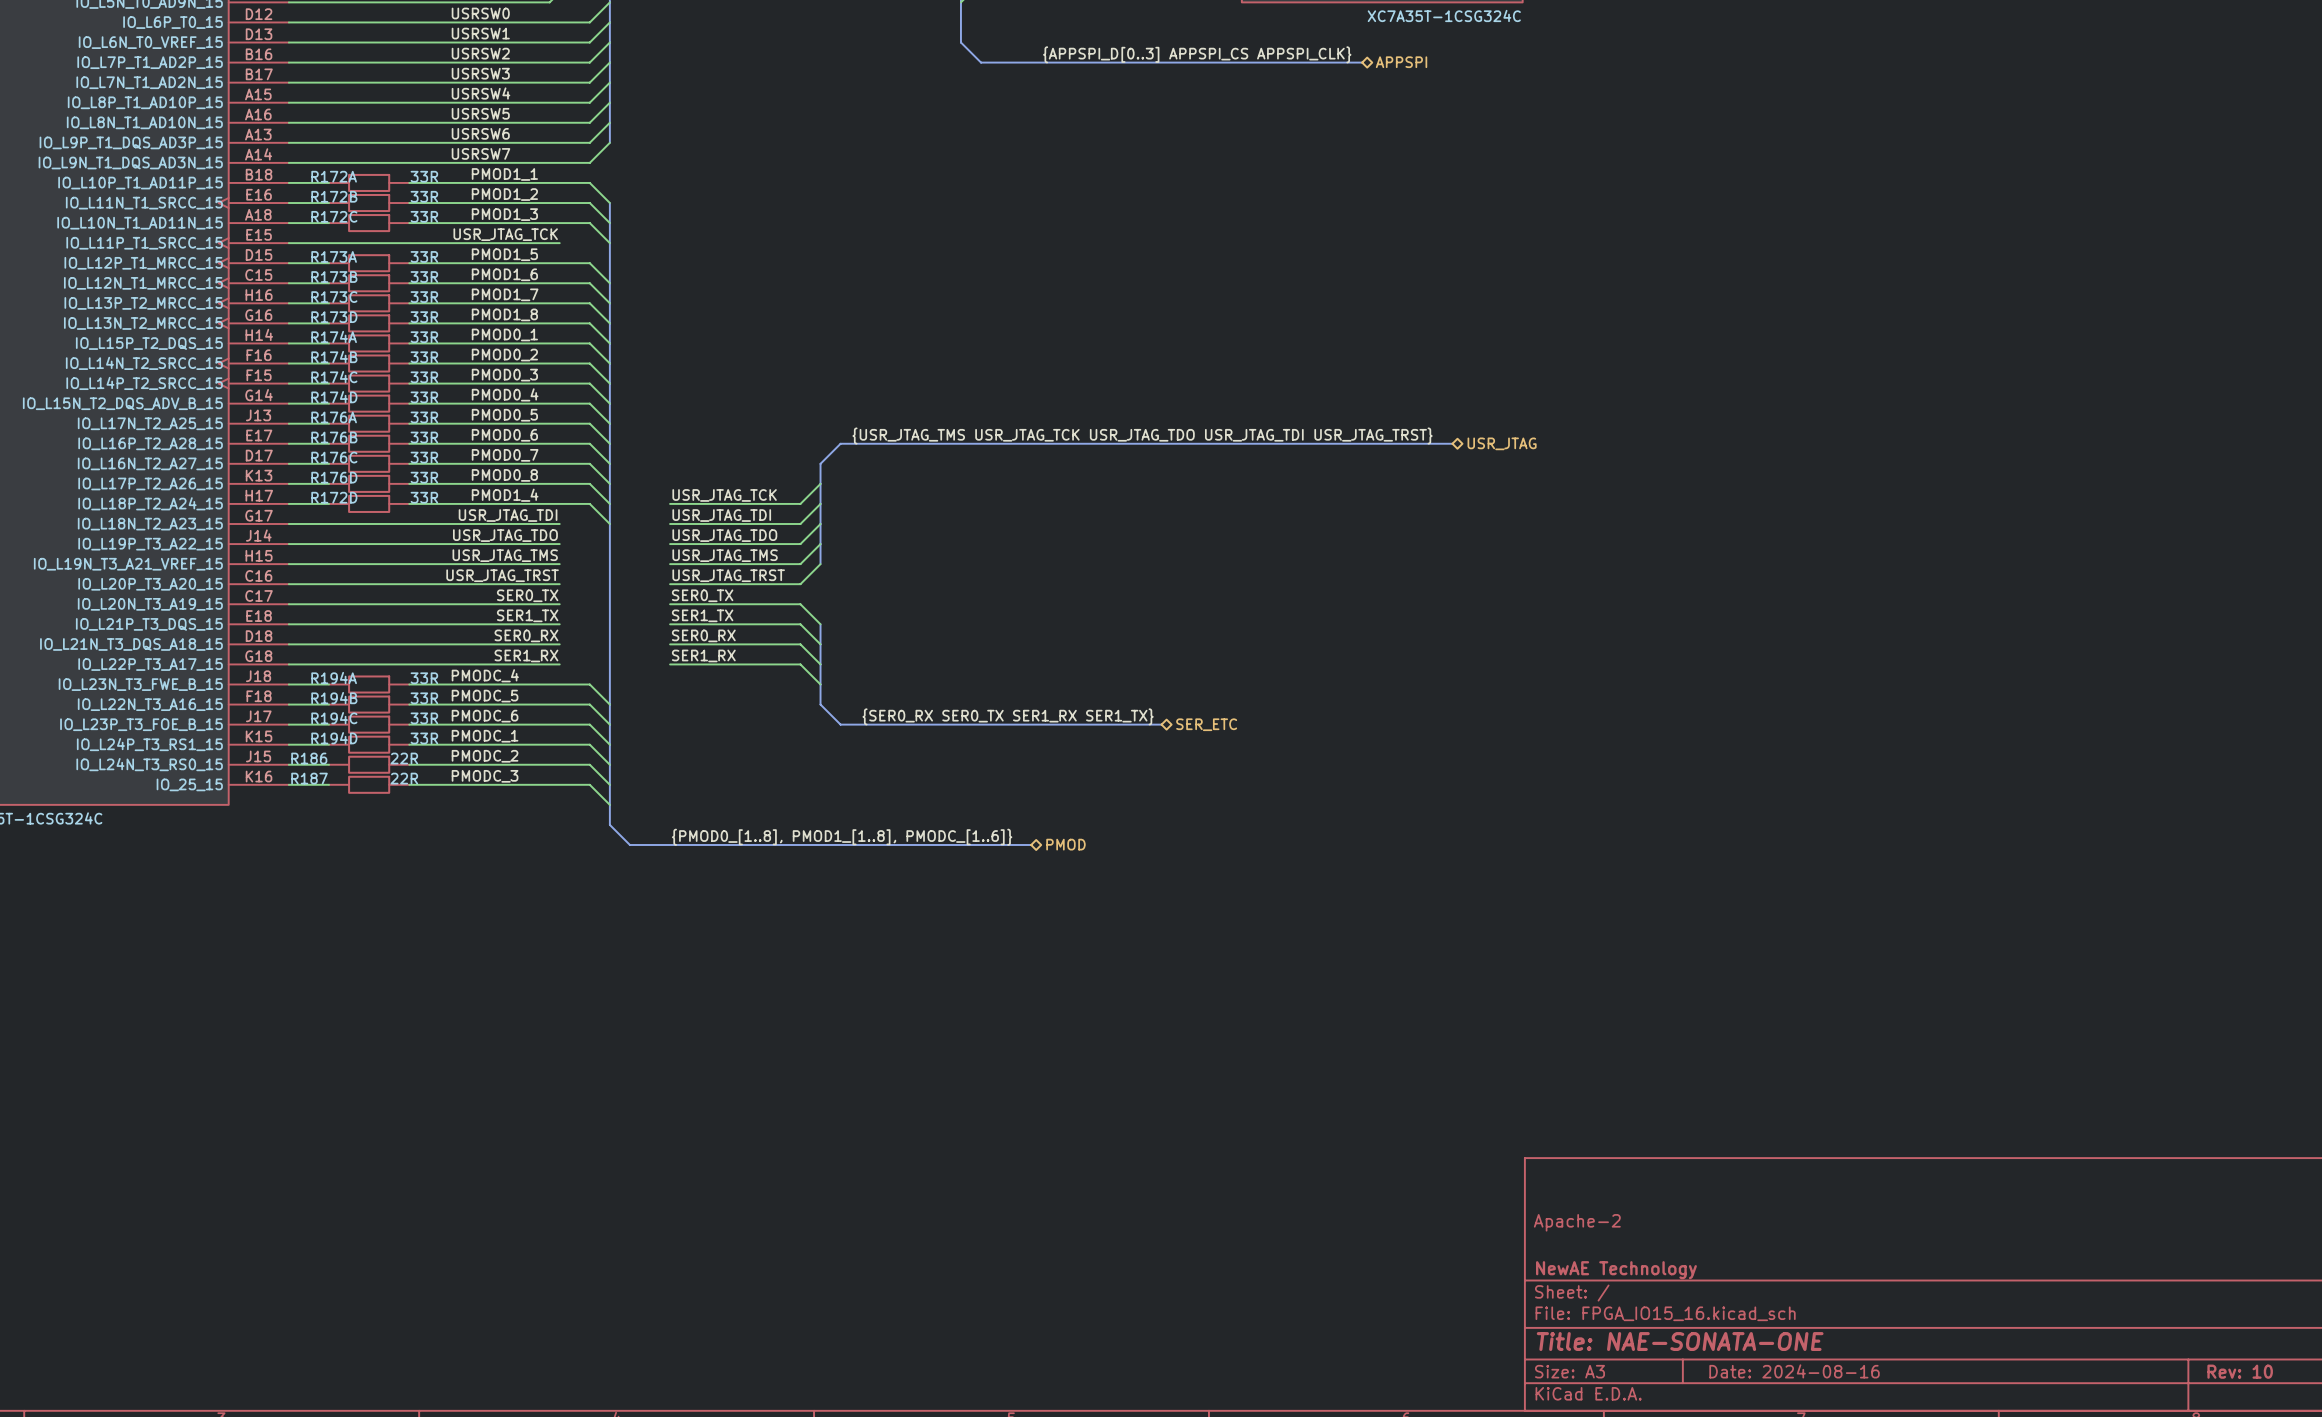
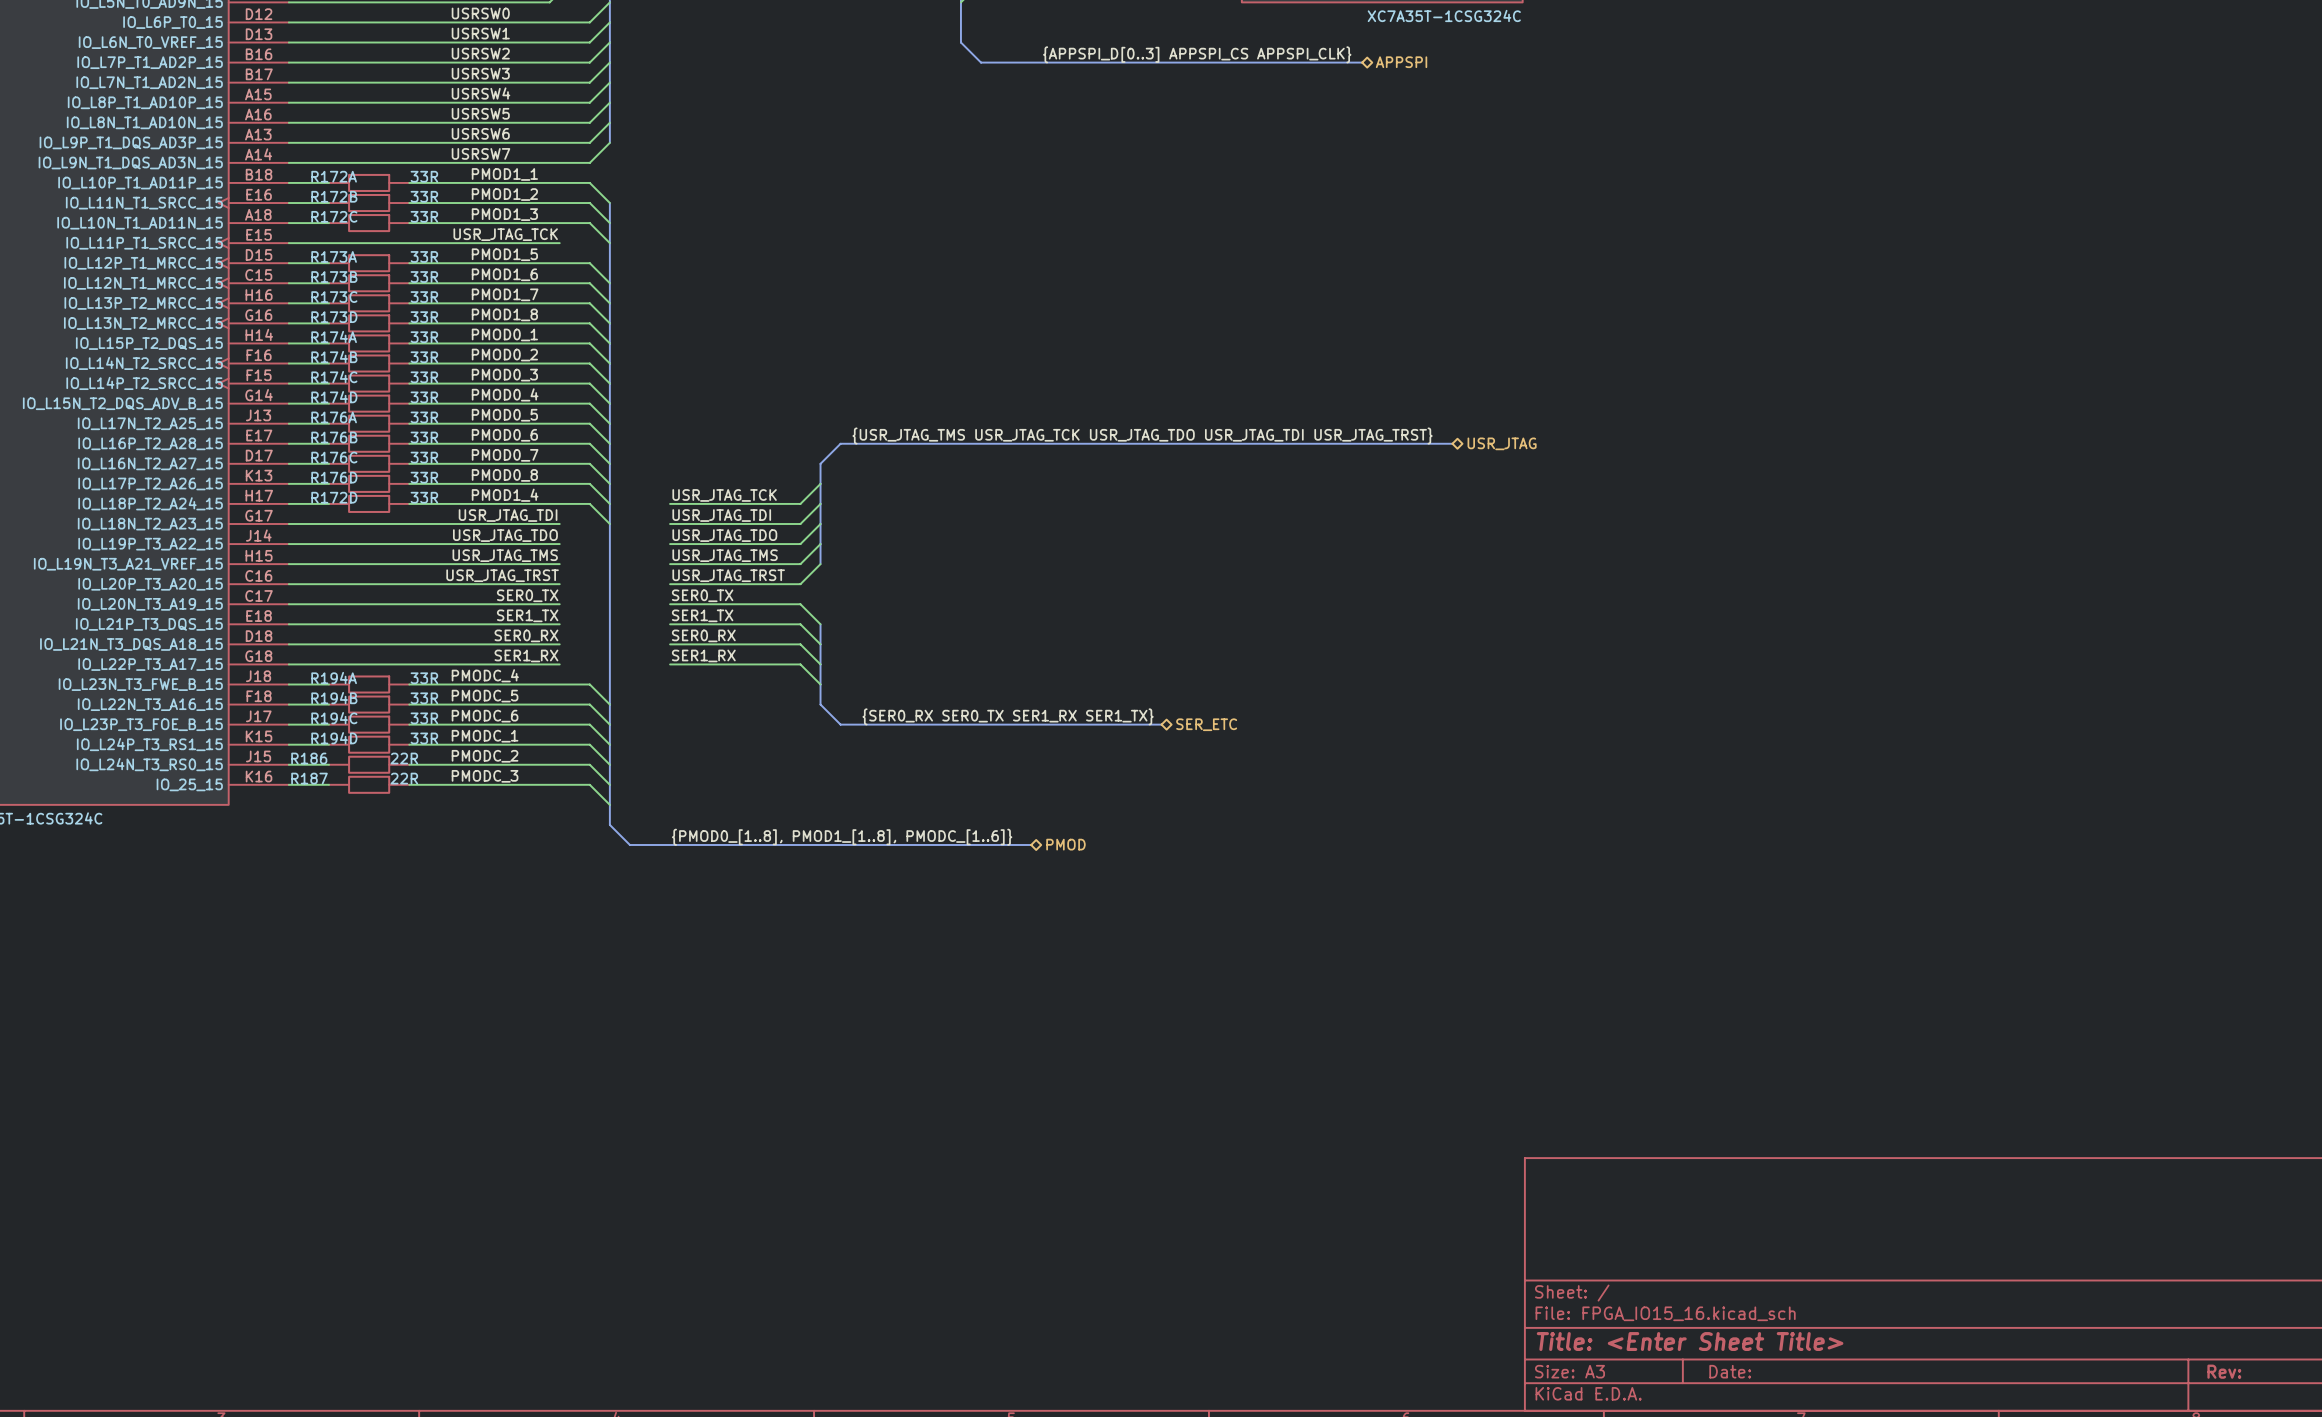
title block: Apache-2 (1577, 1222) -> none
title block: NewAE Technology (1616, 1270) -> none
title block: Title: NAE-SONATA-ONE (1680, 1341) -> Title: <Enter Sheet Title> (1690, 1341)
title block: Date: 2024-08-16 (1794, 1371) -> Date: (1730, 1371)
title block: Rev: 10 (2240, 1371) -> Rev: (2224, 1371)

